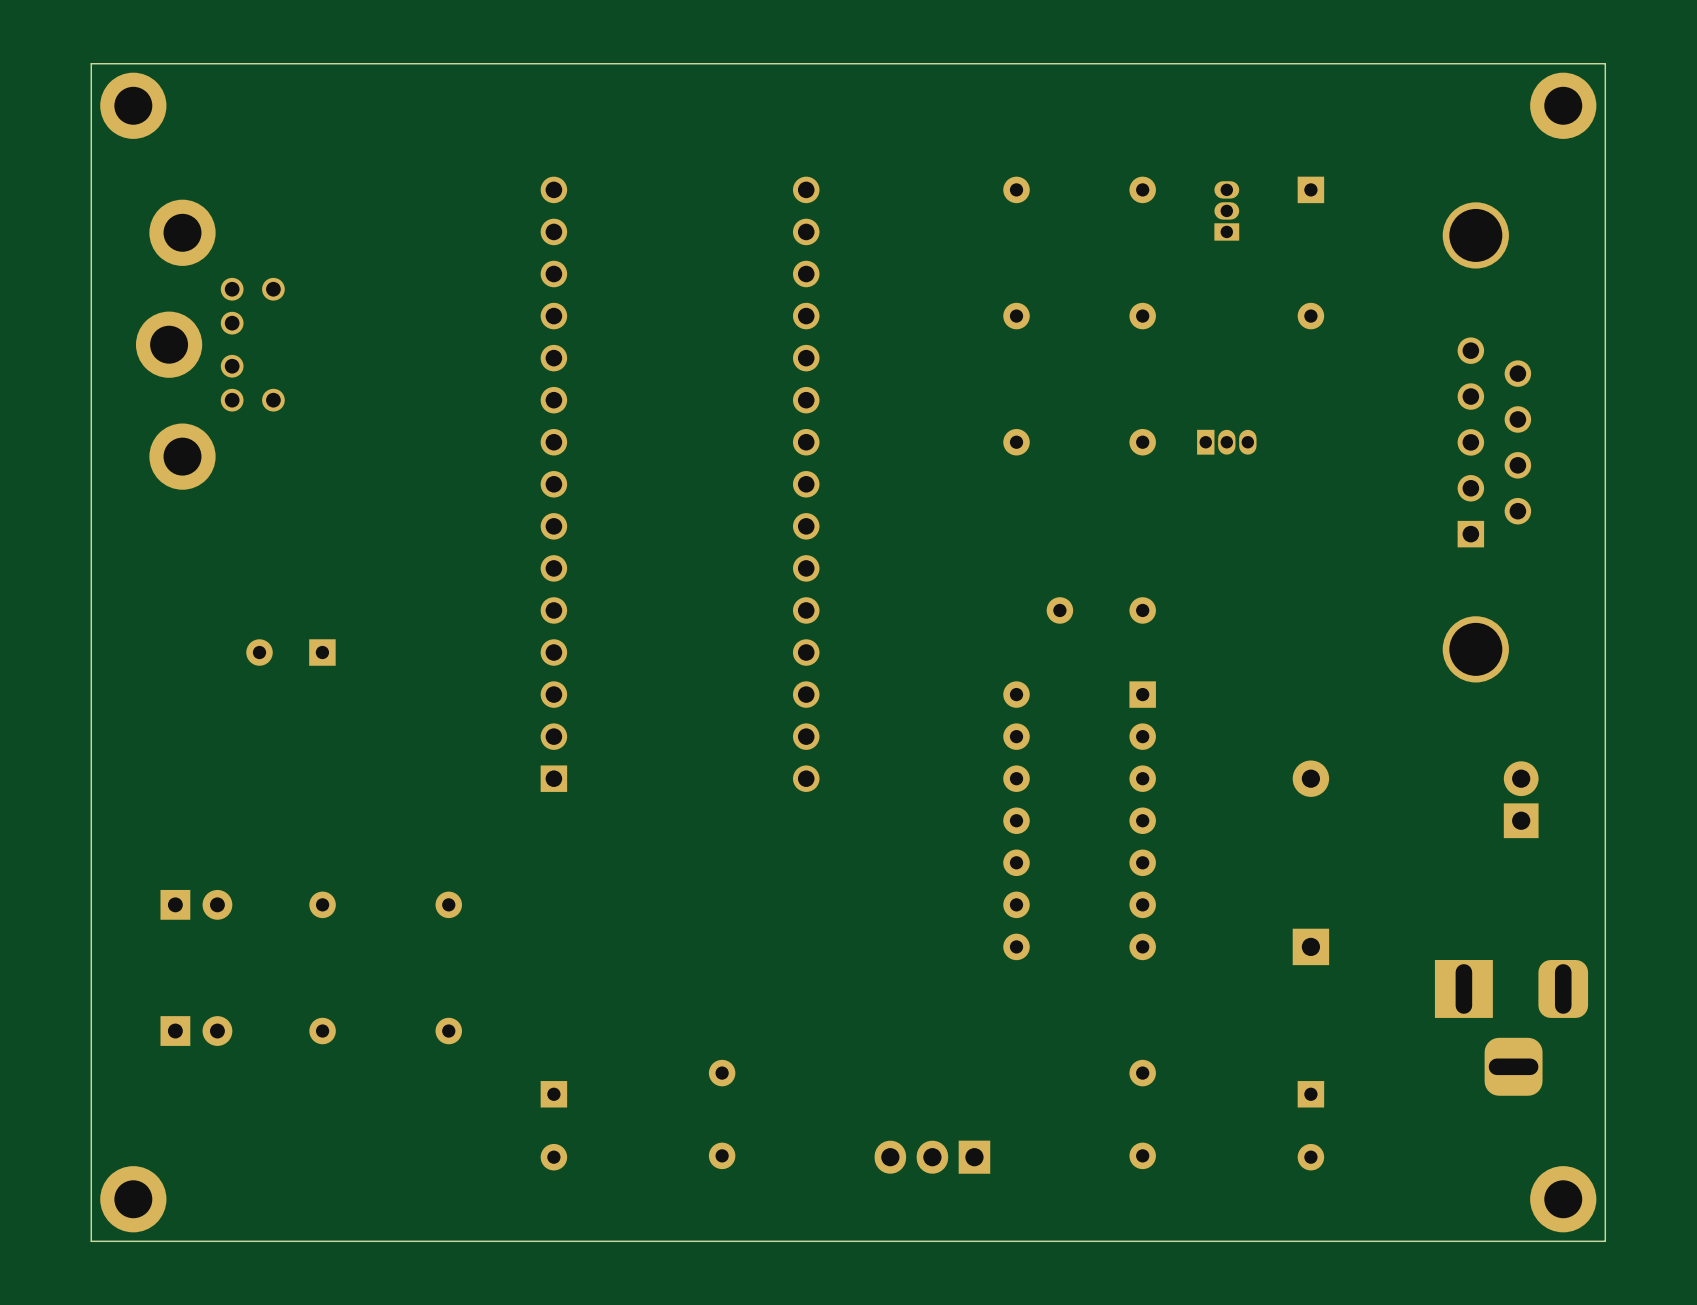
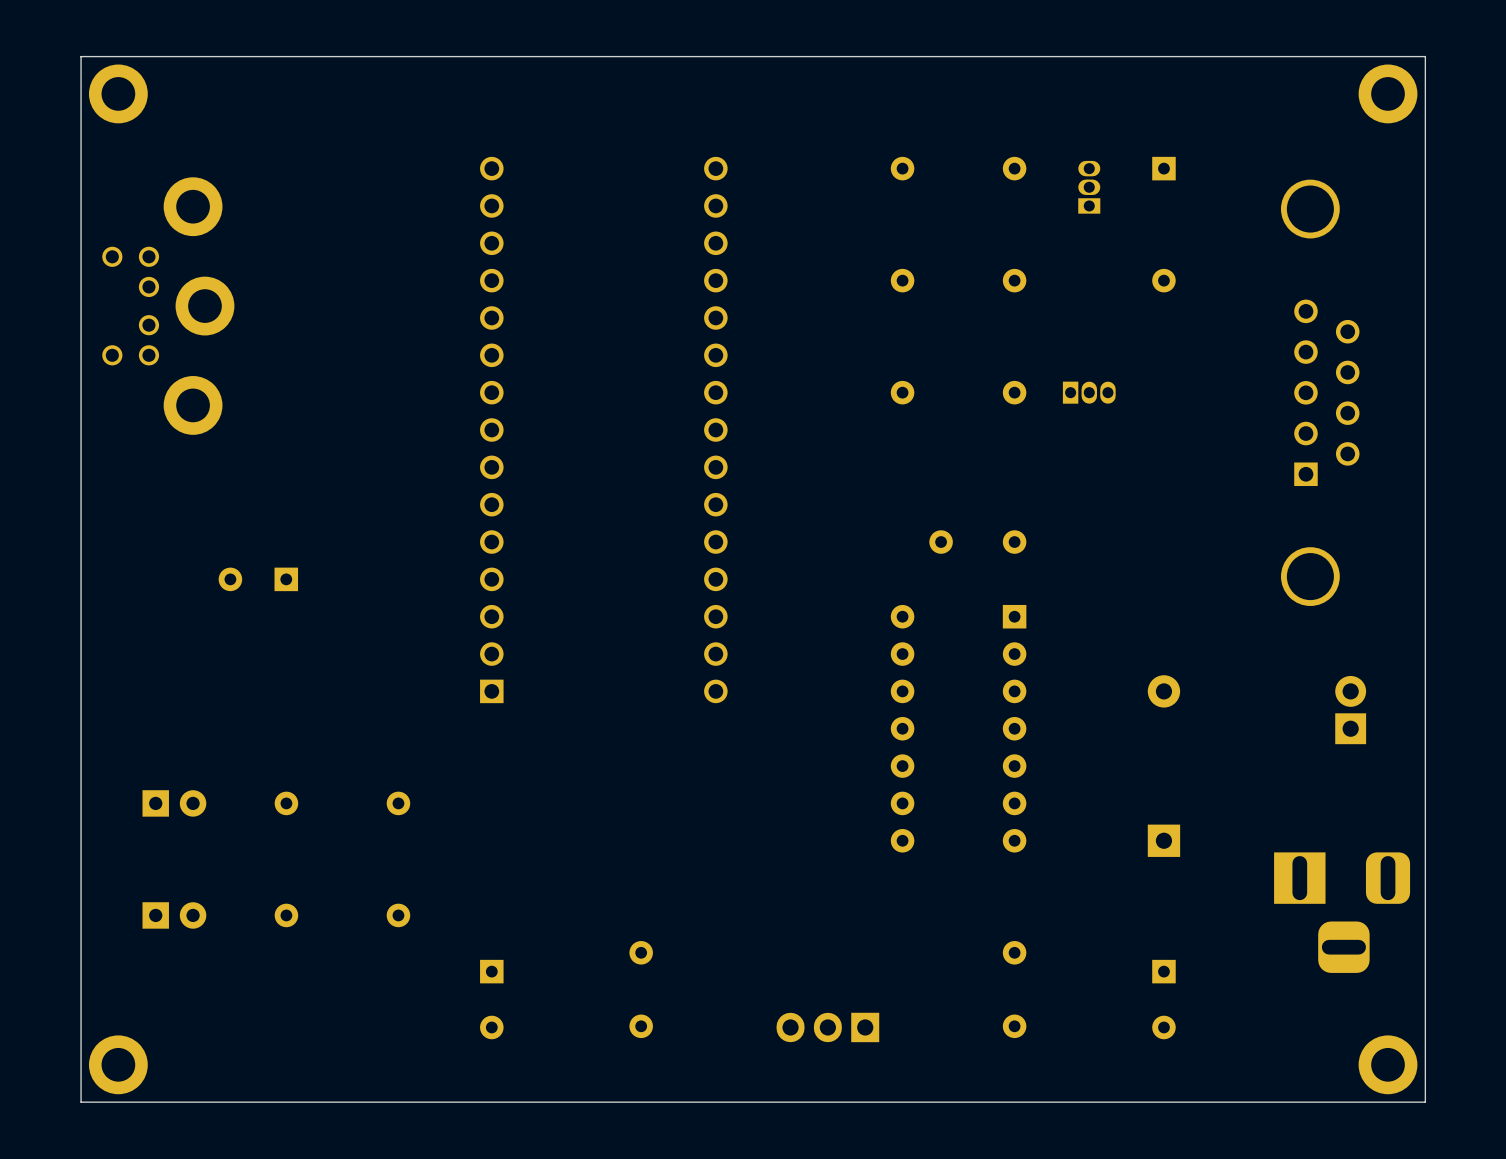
part rotation: 0° (210, 344) -> 180° (168, 306)

